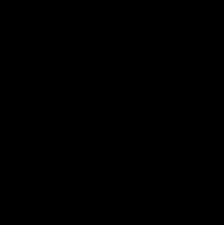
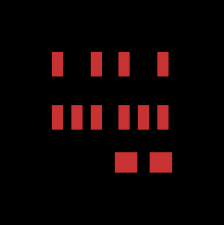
part: none -> (76, 90)
part: none -> (143, 90)
part: none -> (143, 162)

